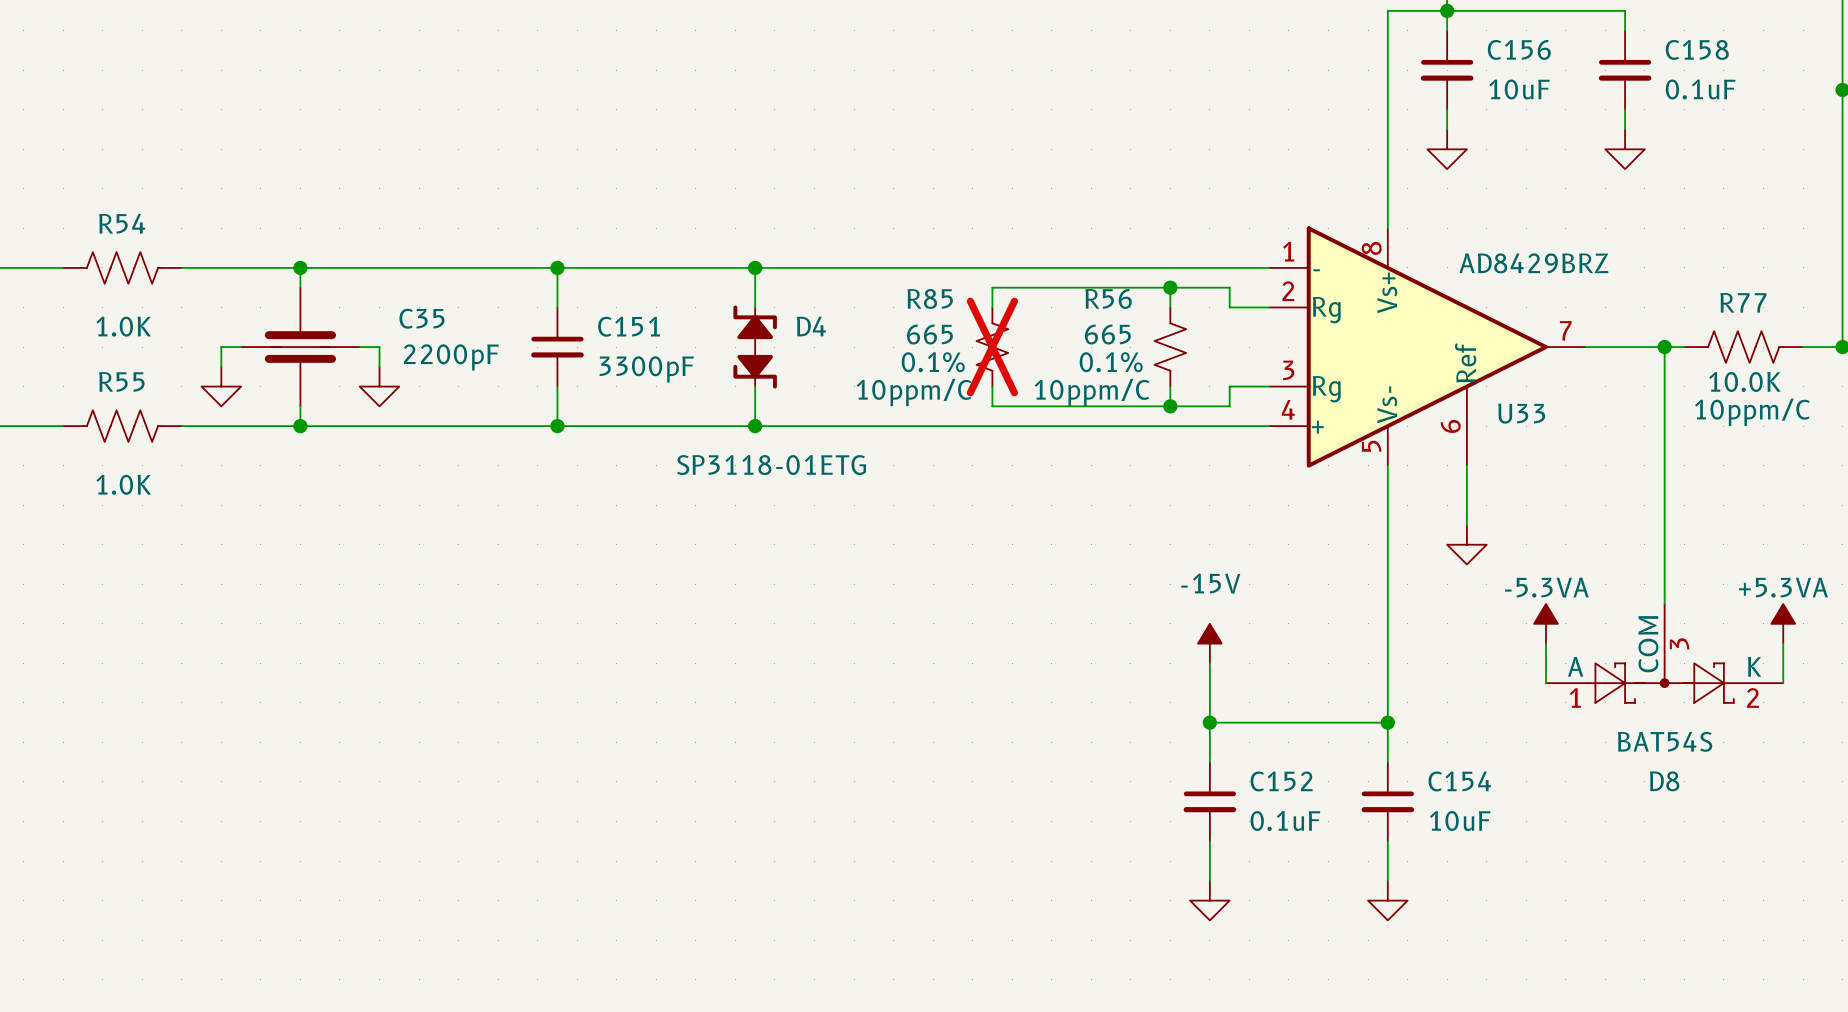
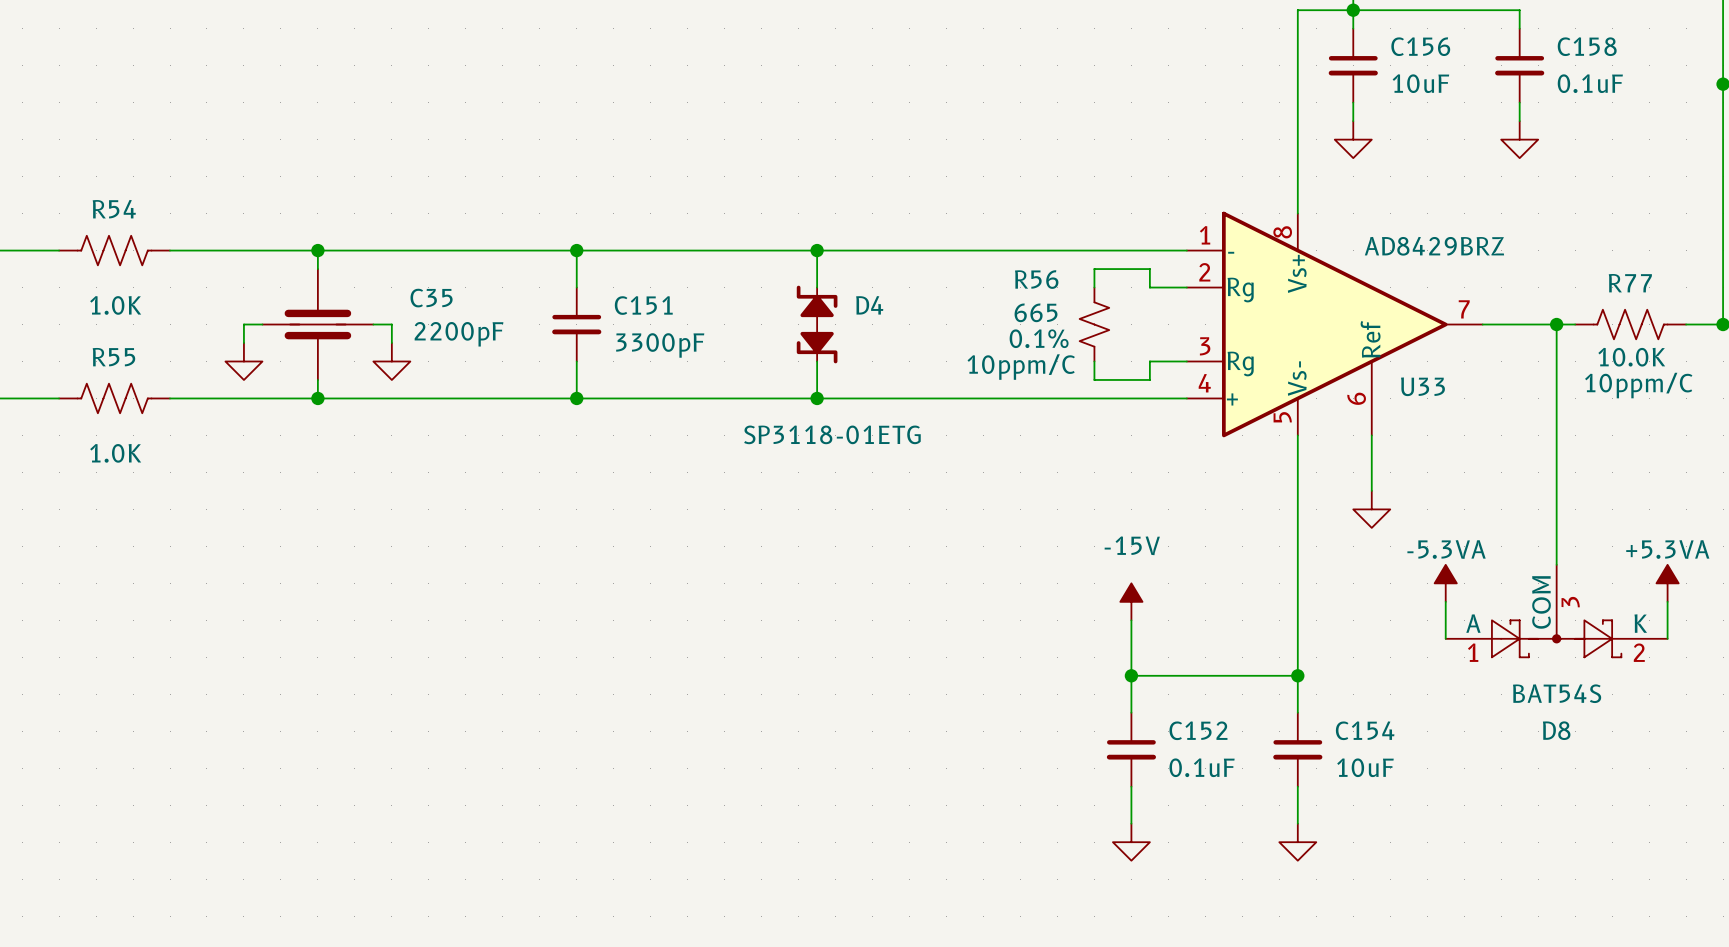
wire: (300, 267) (300, 287) -> (317, 250) (317, 269)
junction position: (300, 267) -> (317, 250)
wire: (557, 267) (557, 307) -> (576, 250) (576, 287)
junction position: (557, 267) -> (576, 250)
wire: (755, 267) (755, 307) -> (817, 250) (817, 287)
junction: (755, 267) -> none
junction: none -> (817, 250)
wire: (1170, 287) (992, 287) (992, 307) -> none
junction: (1170, 287) -> none
wire: (241, 347) (221, 347) (221, 366) -> (262, 324) (243, 324) (243, 343)
C35 position: (300, 347) -> (317, 324)
wire: (359, 347) (379, 347) (379, 366) -> (373, 324) (391, 324) (391, 343)
C151 position: (557, 347) -> (576, 324)
D4 position: (755, 347) -> (817, 324)
R85: 665 (992, 347) -> none
power symbol position: (221, 386) -> (243, 361)
power symbol position: (379, 386) -> (391, 361)
wire: (557, 386) (557, 426) -> (576, 361) (576, 398)
wire: (755, 386) (755, 426) -> (817, 361) (817, 398)
wire: (992, 386) (992, 406) (1170, 406) -> none
wire: (300, 406) (300, 426) -> (317, 379) (317, 398)
junction: (1170, 406) -> none
junction position: (300, 426) -> (317, 398)
junction position: (557, 426) -> (576, 398)
junction: (755, 426) -> none
junction: none -> (817, 398)

